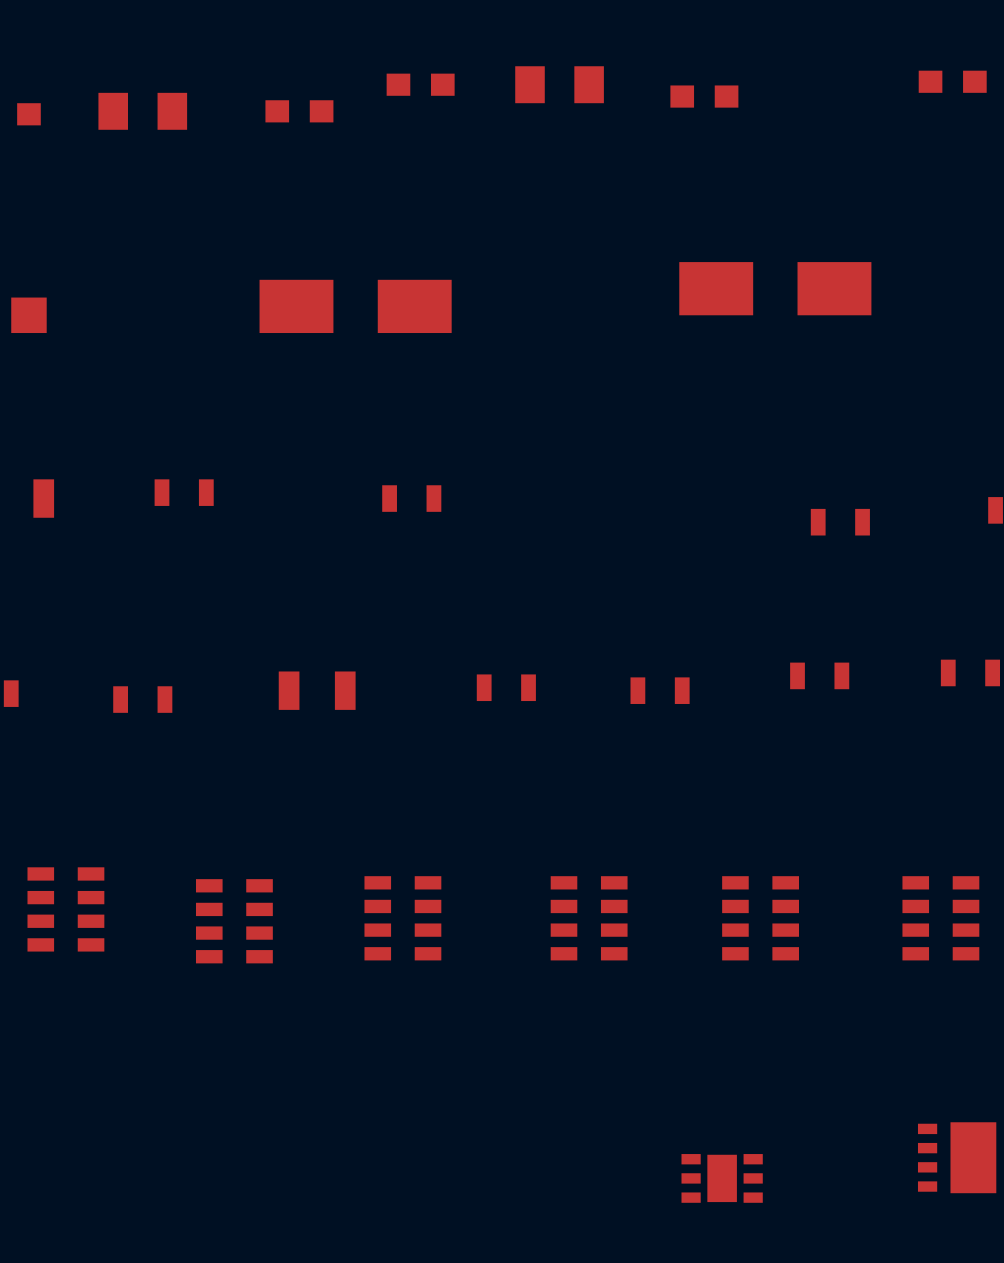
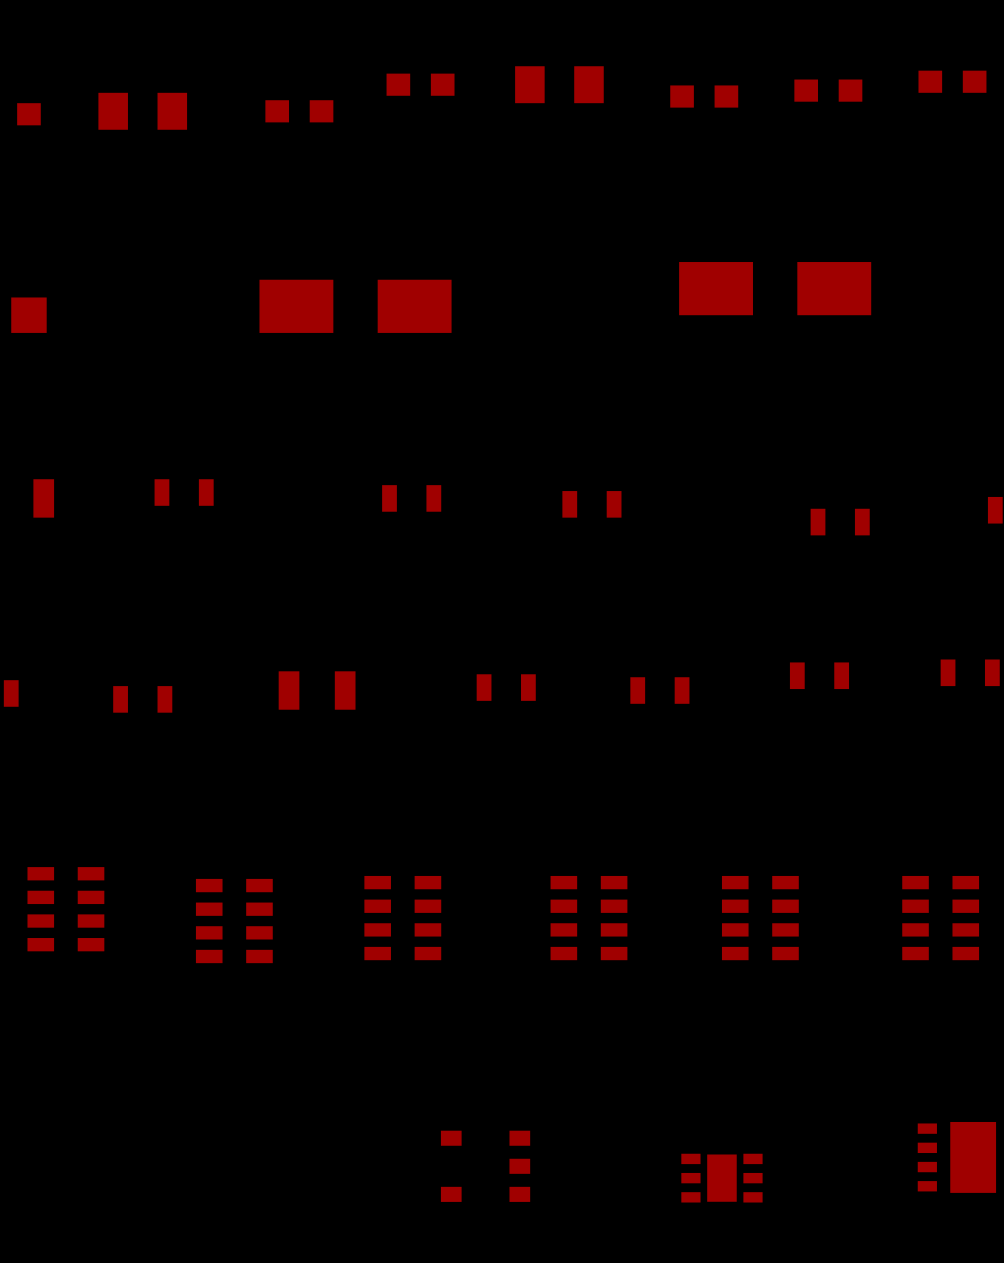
part: none -> (828, 90)
part: none -> (591, 504)
part: none -> (485, 1166)

